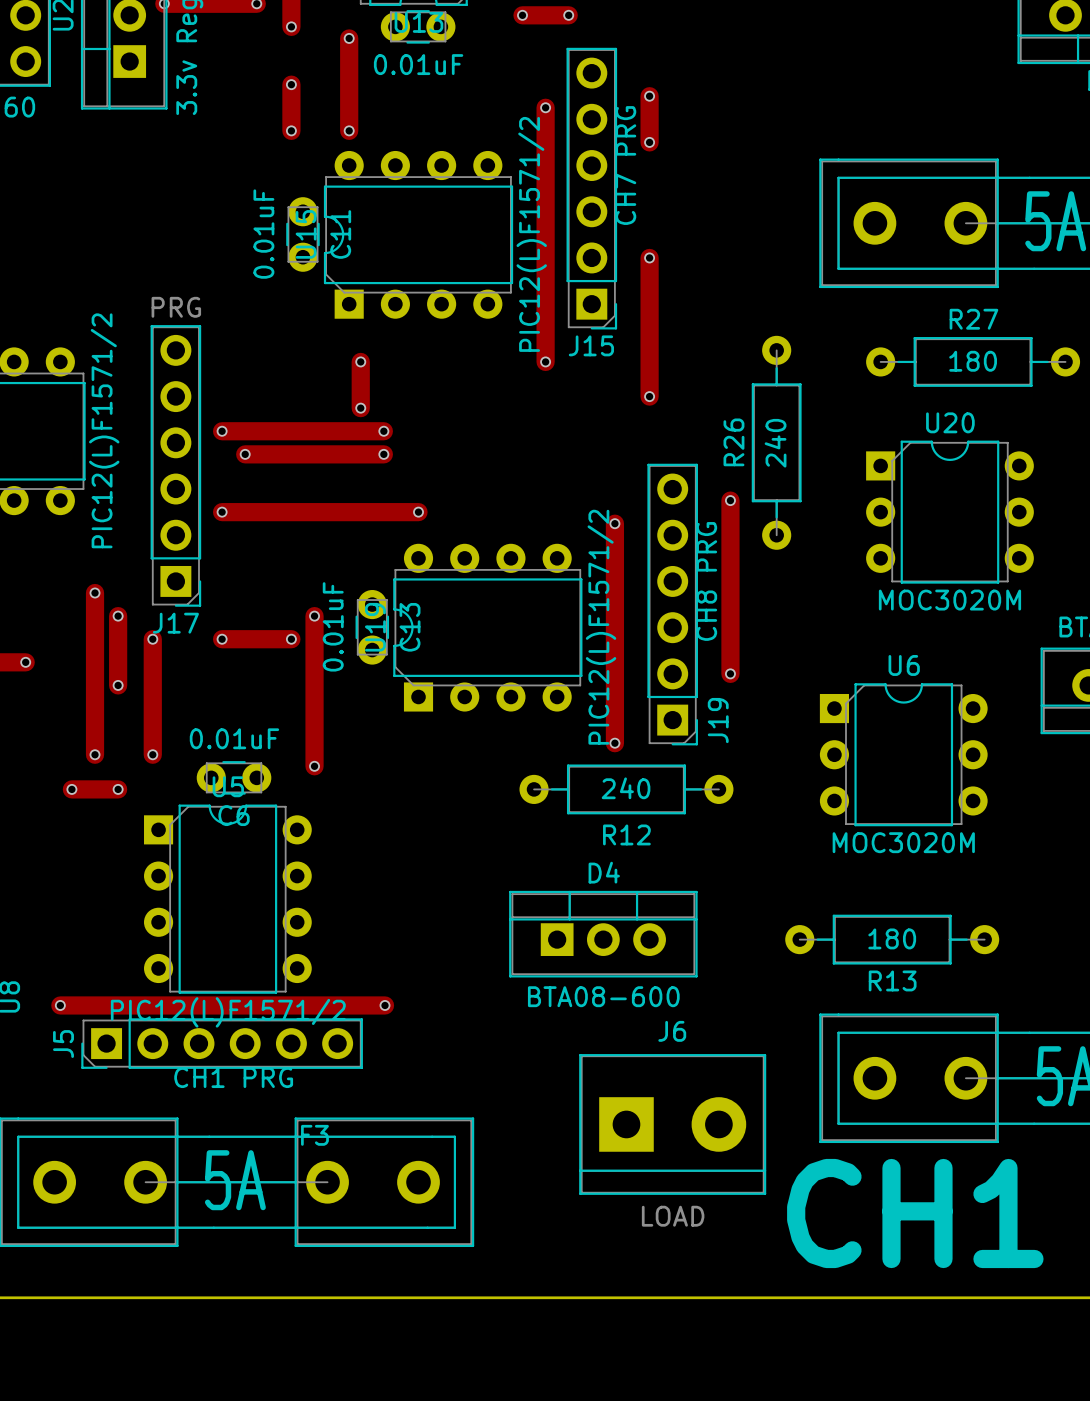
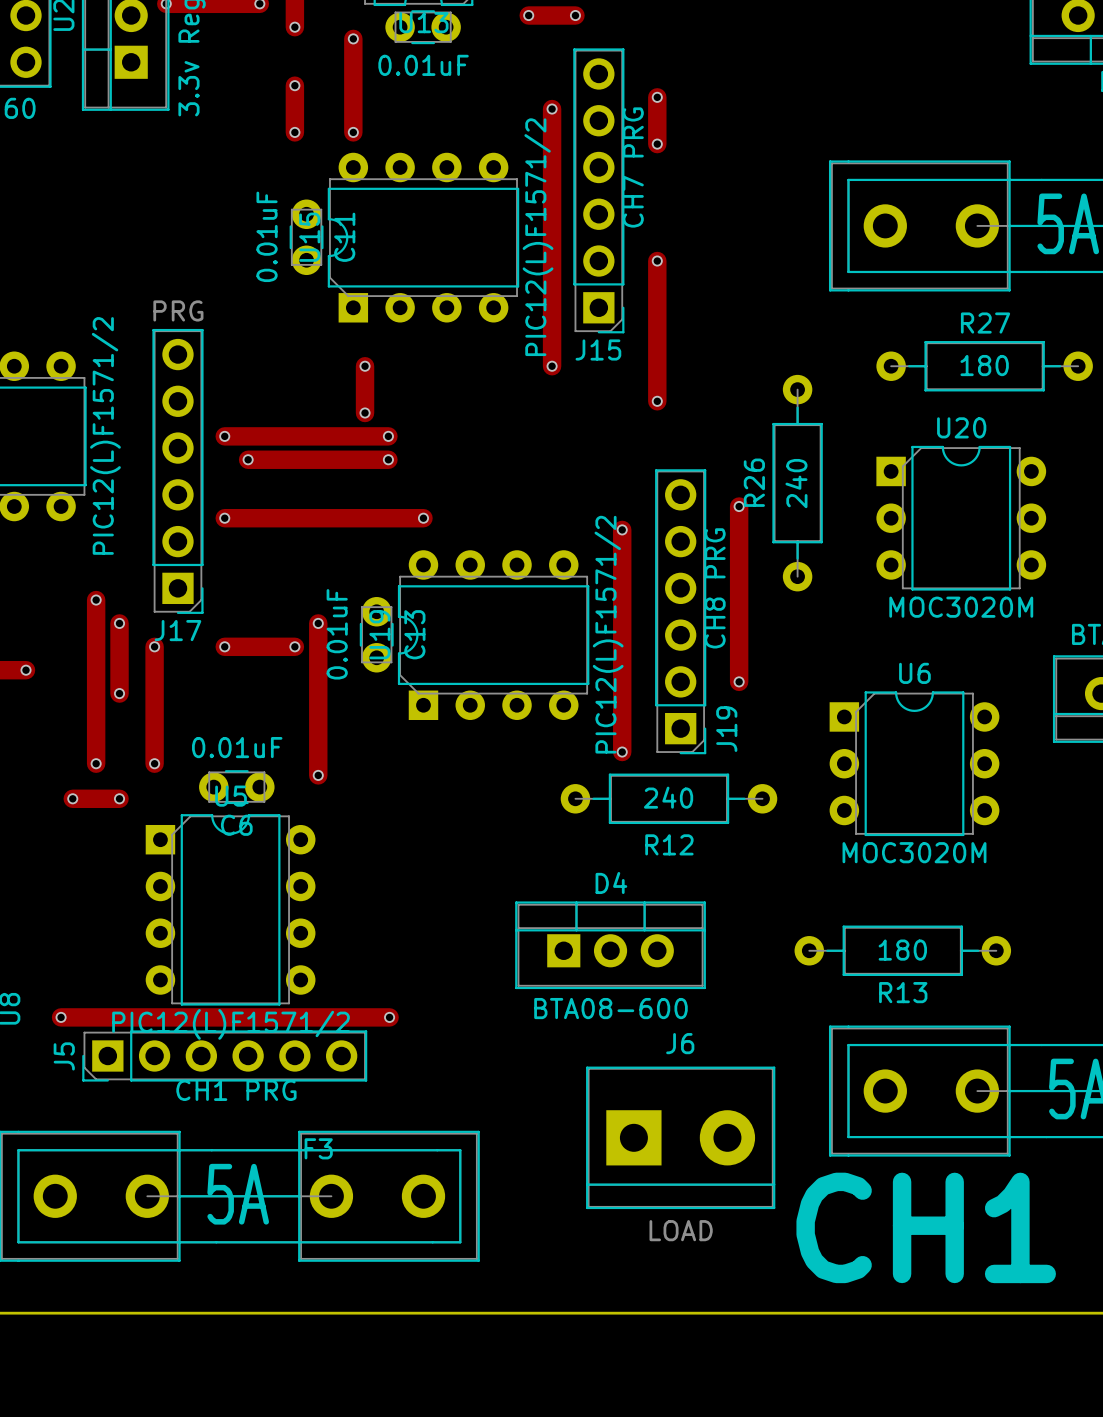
R26 position: (776, 442) -> (797, 483)
R12 position: (626, 789) -> (668, 798)

